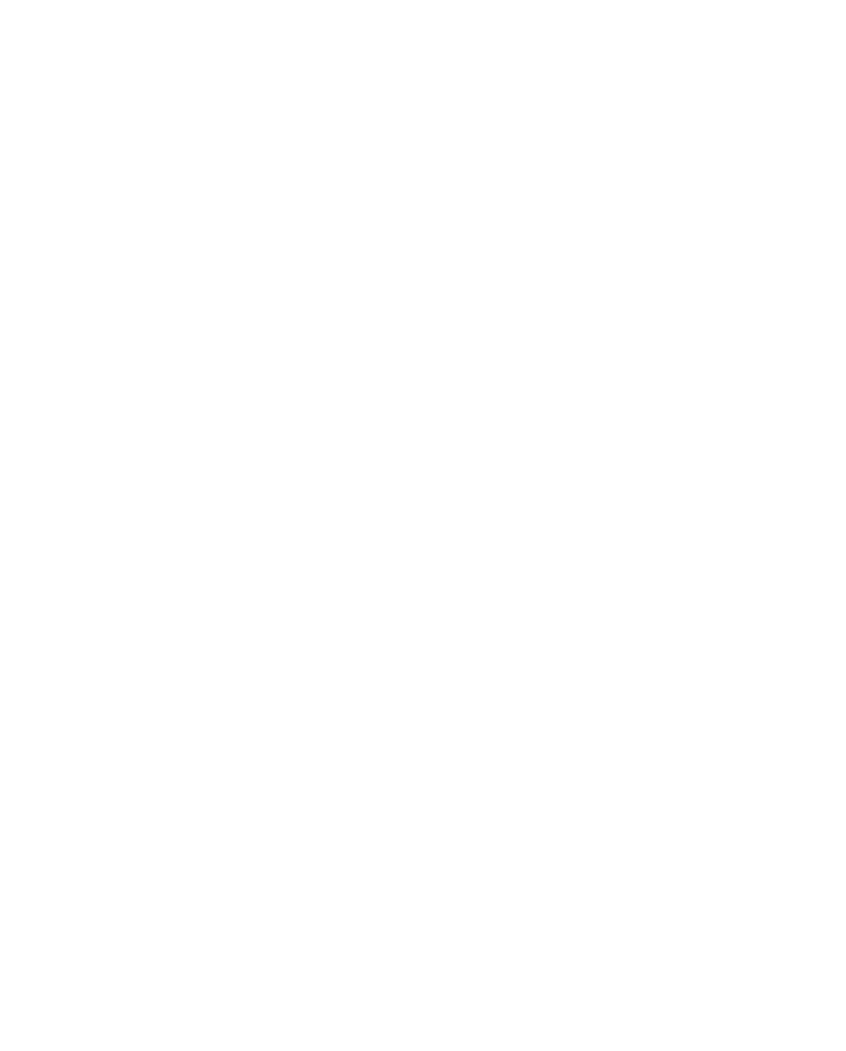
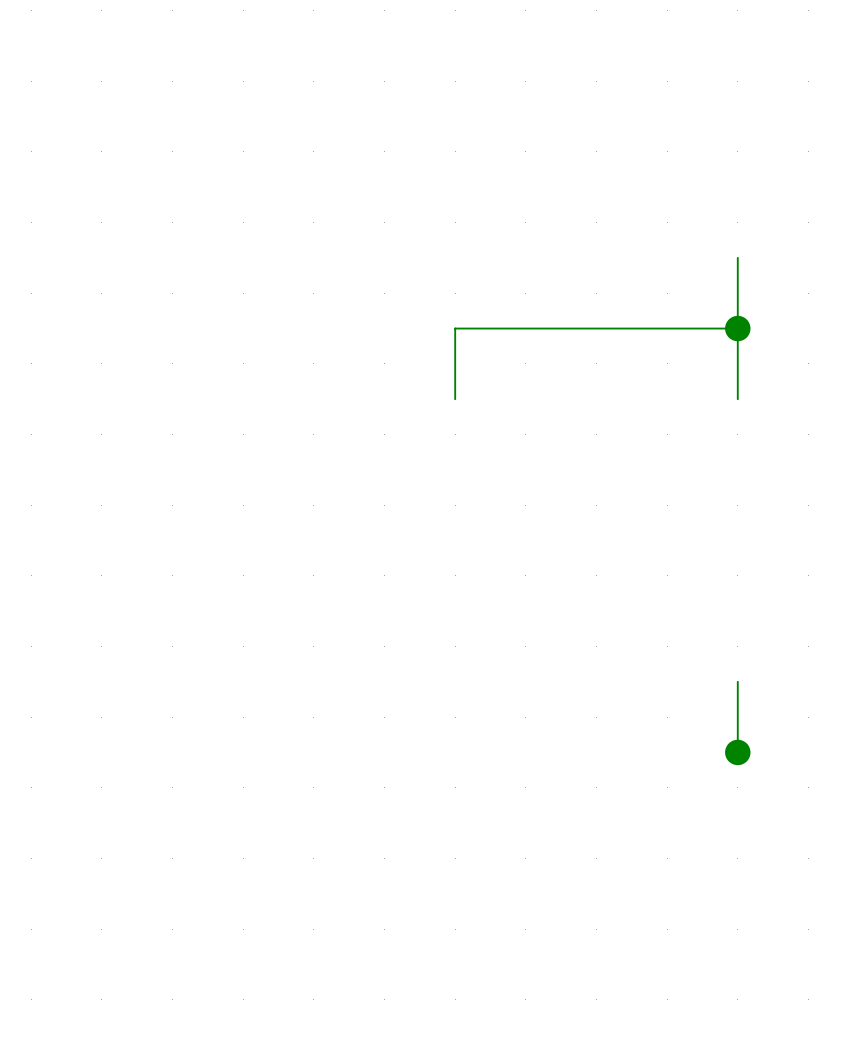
wire: none -> (737, 257) (737, 399)
wire: none -> (737, 328) (455, 328) (455, 399)
junction: none -> (737, 328)
wire: none -> (737, 681) (737, 752)
junction: none -> (737, 752)

